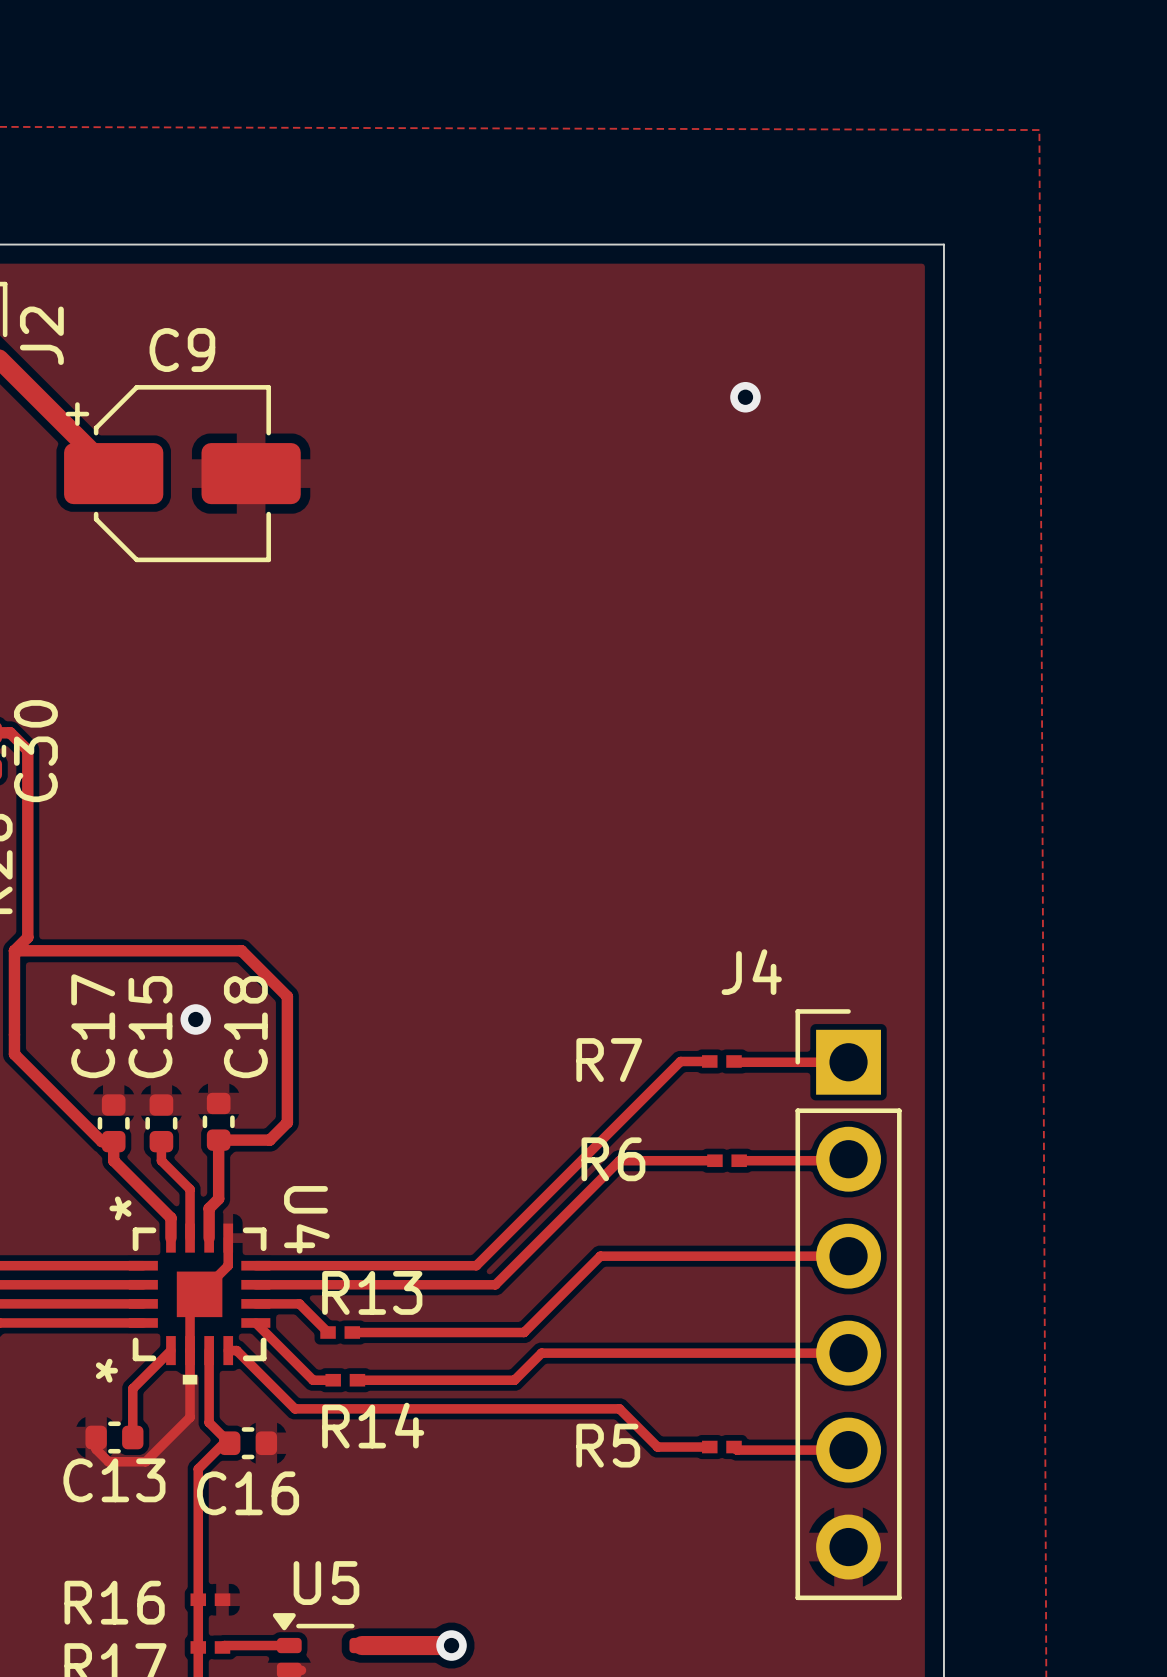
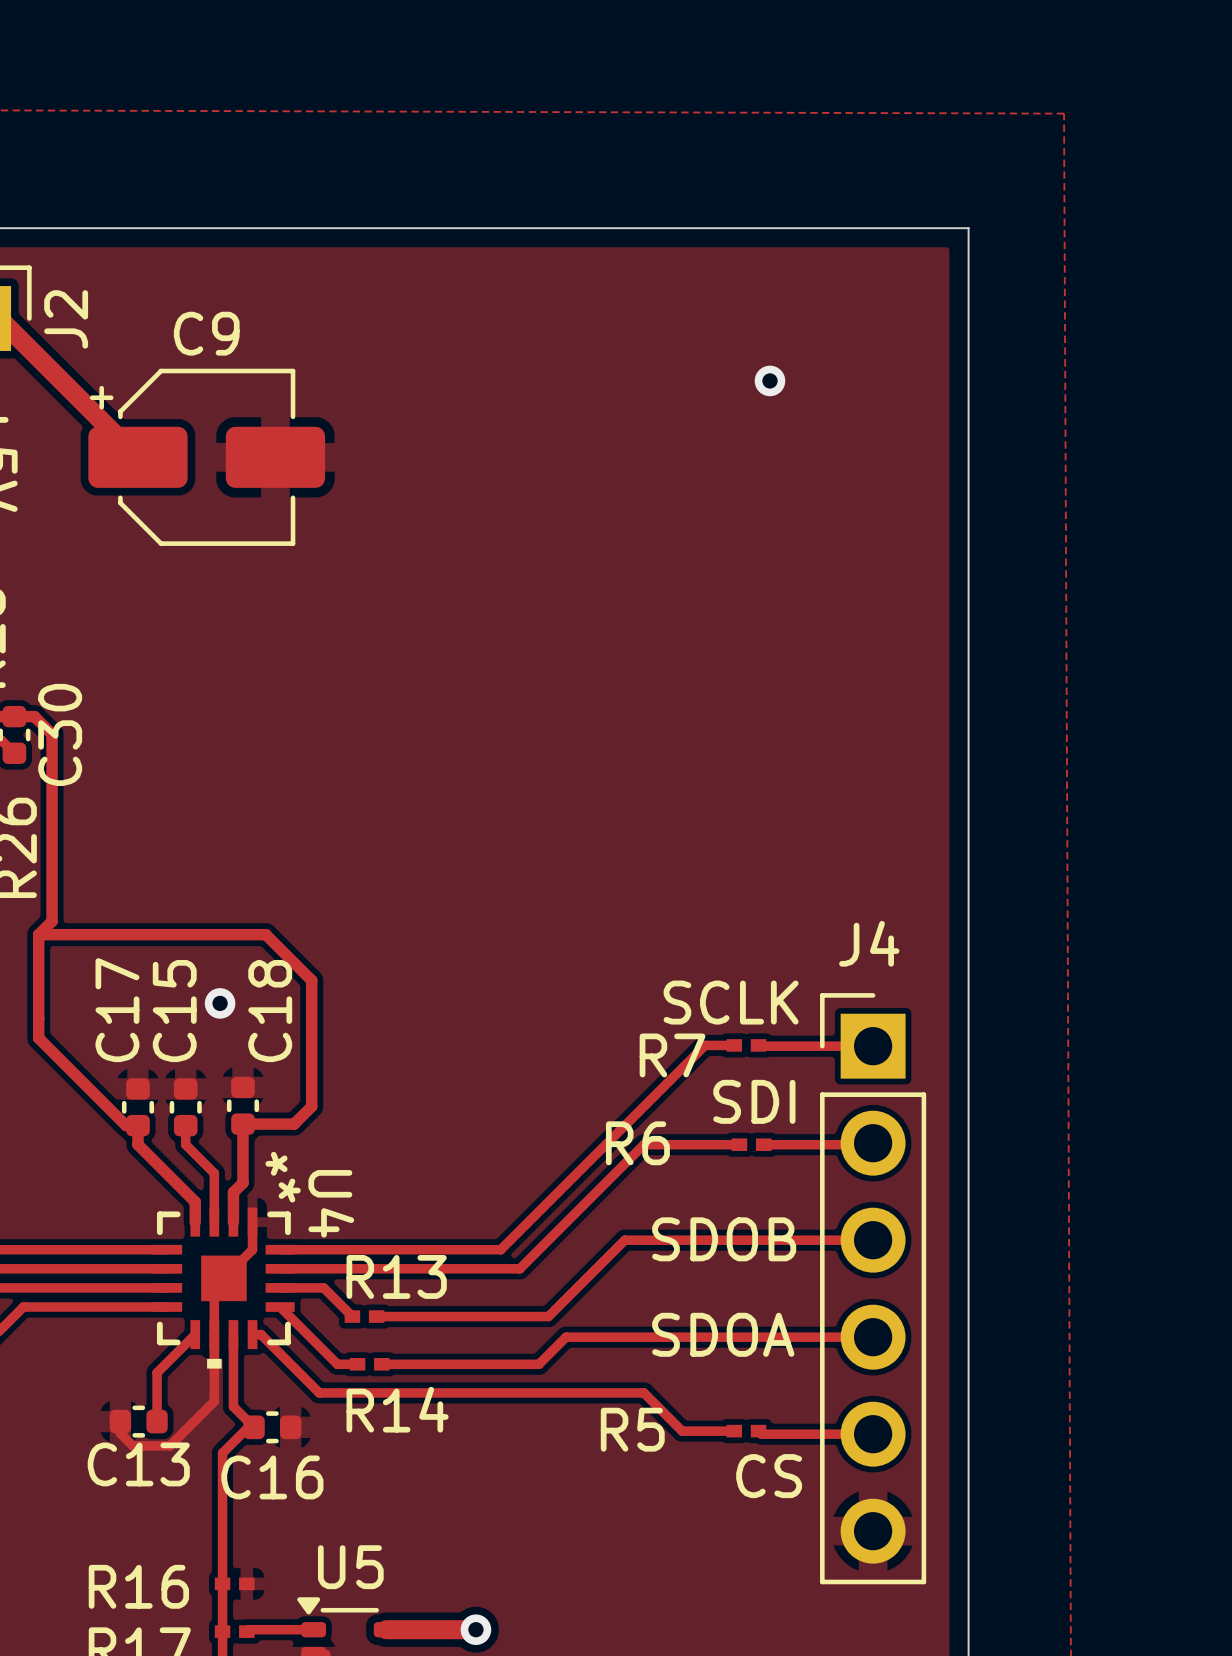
J4 name position: J4 (751, 972) -> J4 (869, 943)
text: none -> SCLK (731, 1002)
R7 name position: R7 (609, 1060) -> R7 (672, 1055)
text: none -> SDI (754, 1101)
U4 text position: * (120, 1208) -> * (276, 1163)
text: none -> SDOB (724, 1239)
text: none -> SDOA (723, 1334)
U4 text position: * (106, 1370) -> * (289, 1190)
text: none -> CS (769, 1476)

